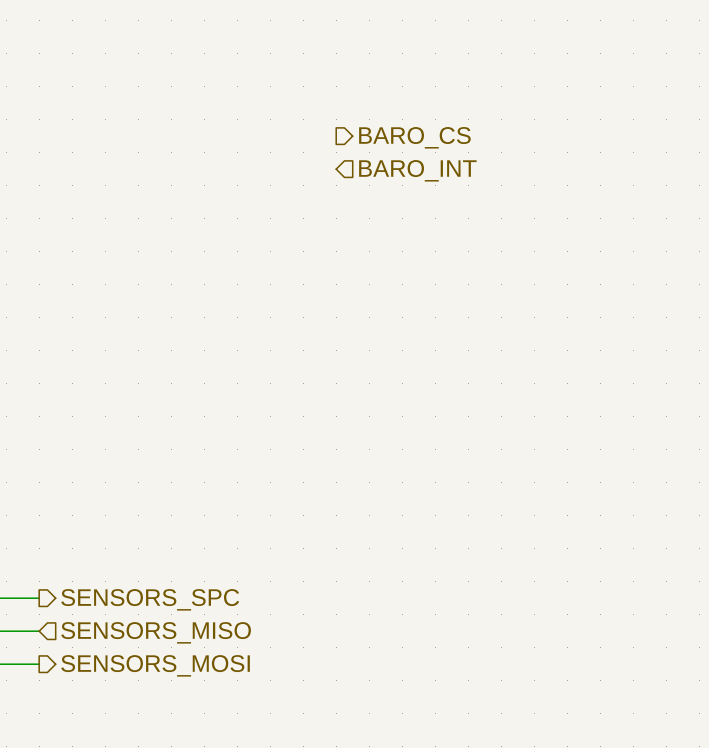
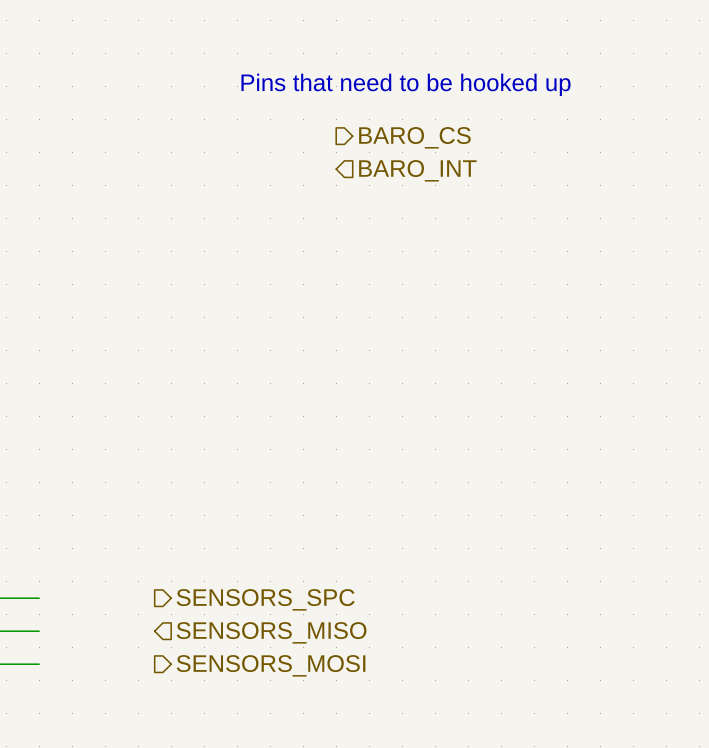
text: none -> Pins that need to be hooked up (405, 84)
hierarchical label position: SENSORS_SPC (150, 599) -> SENSORS_SPC (265, 599)
hierarchical label position: SENSORS_MISO (156, 632) -> SENSORS_MISO (271, 632)
hierarchical label position: SENSORS_MOSI (155, 665) -> SENSORS_MOSI (271, 665)

